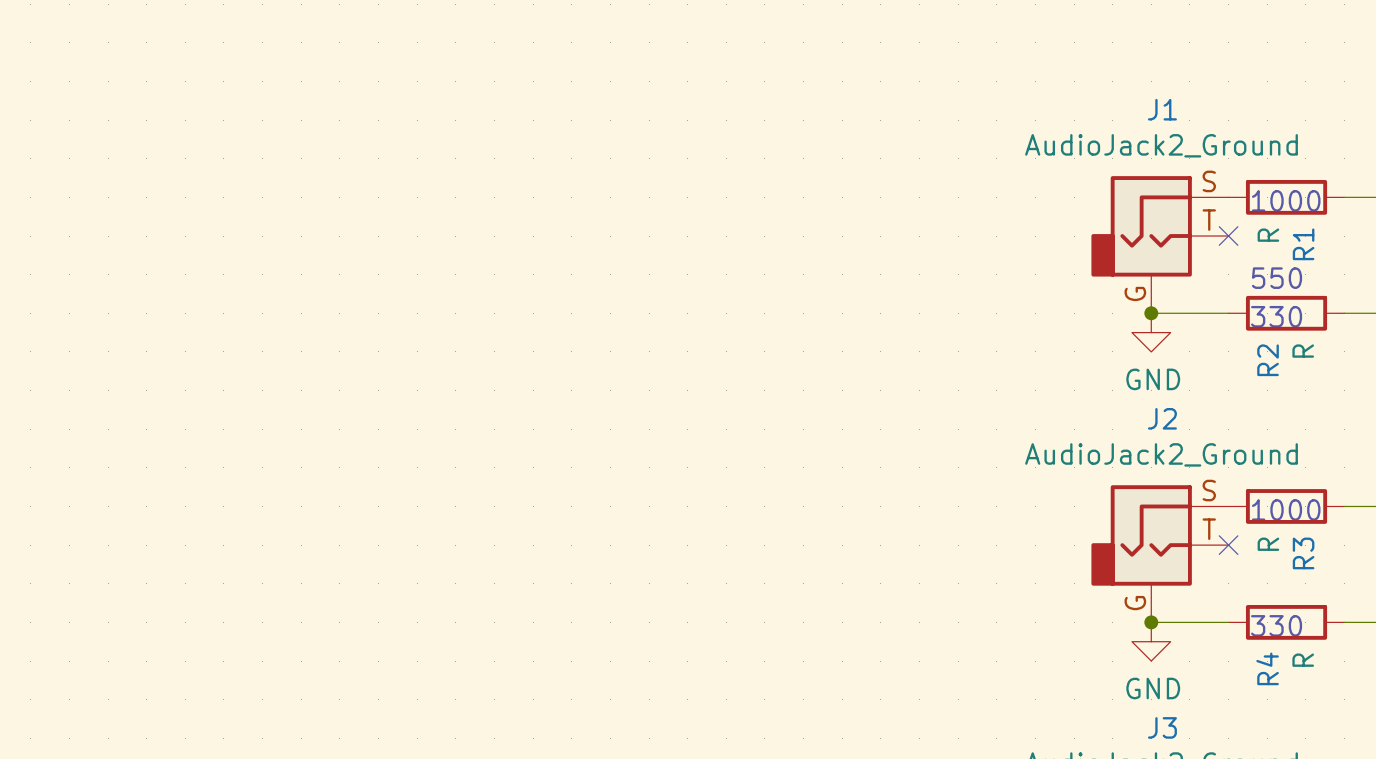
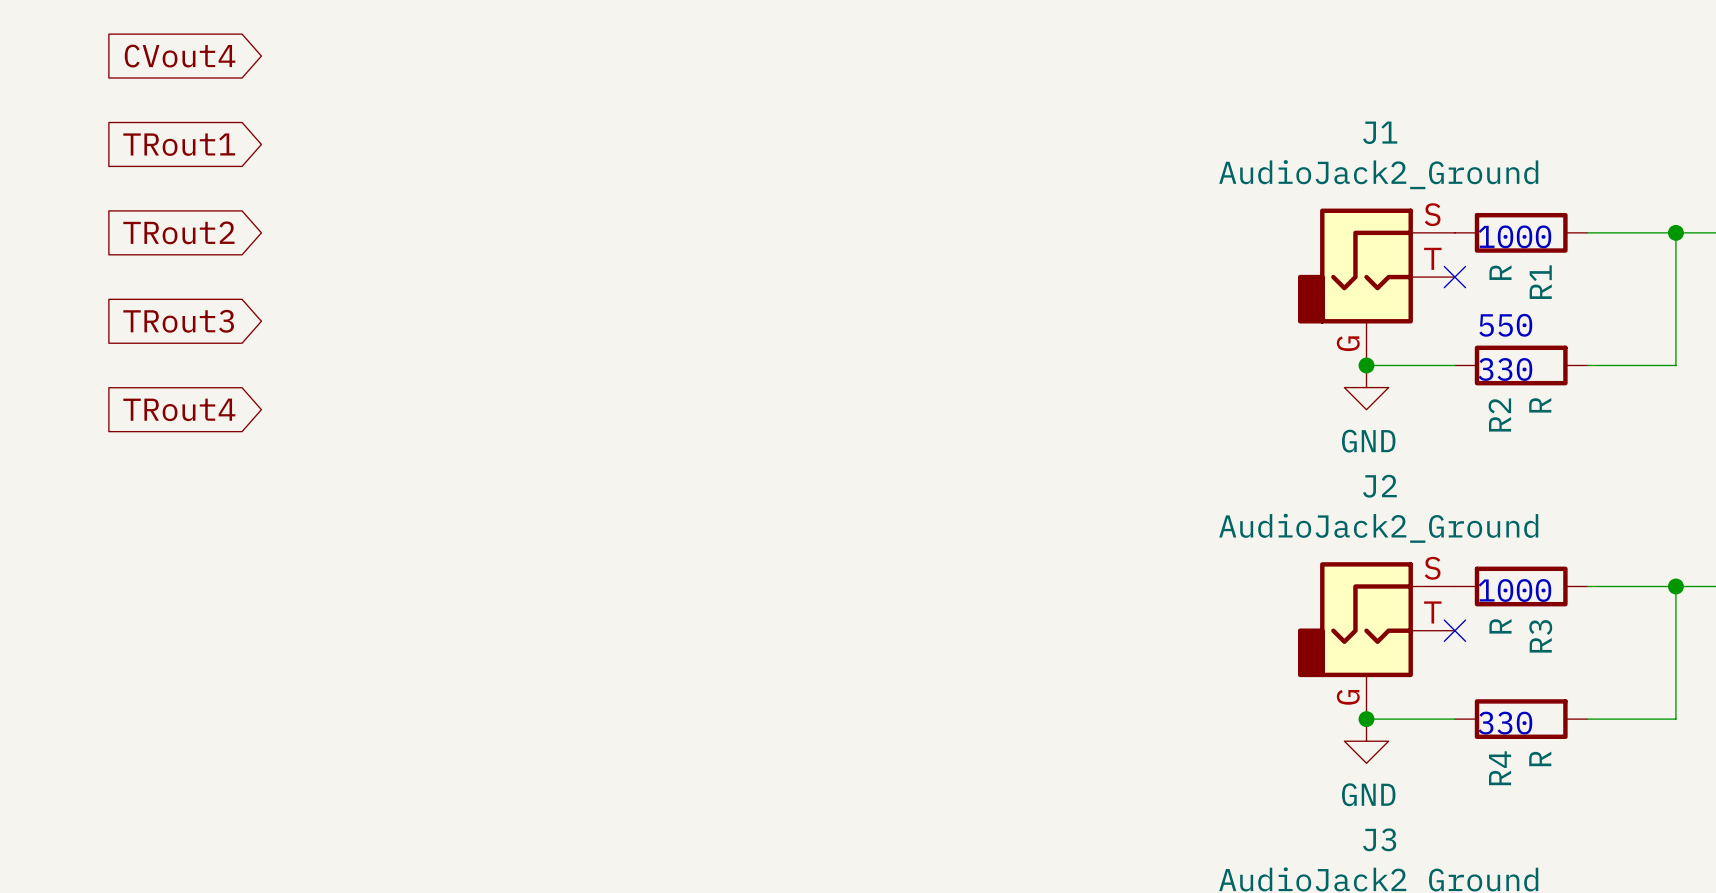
global label: none -> CVout4 (180, 56)
global label: none -> TRout1 (179, 144)
global label: none -> TRout2 (178, 232)
global label: none -> TRout3 (178, 321)
global label: none -> TRout4 (179, 409)

